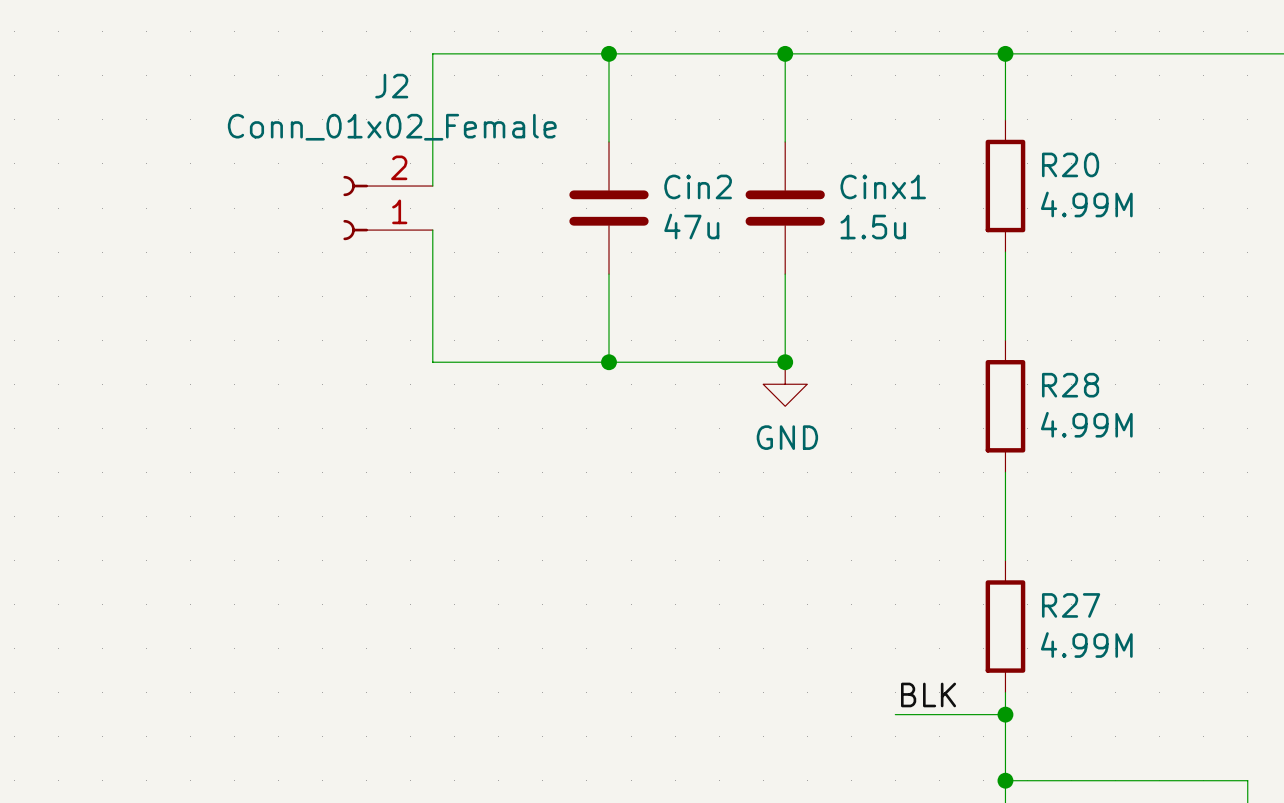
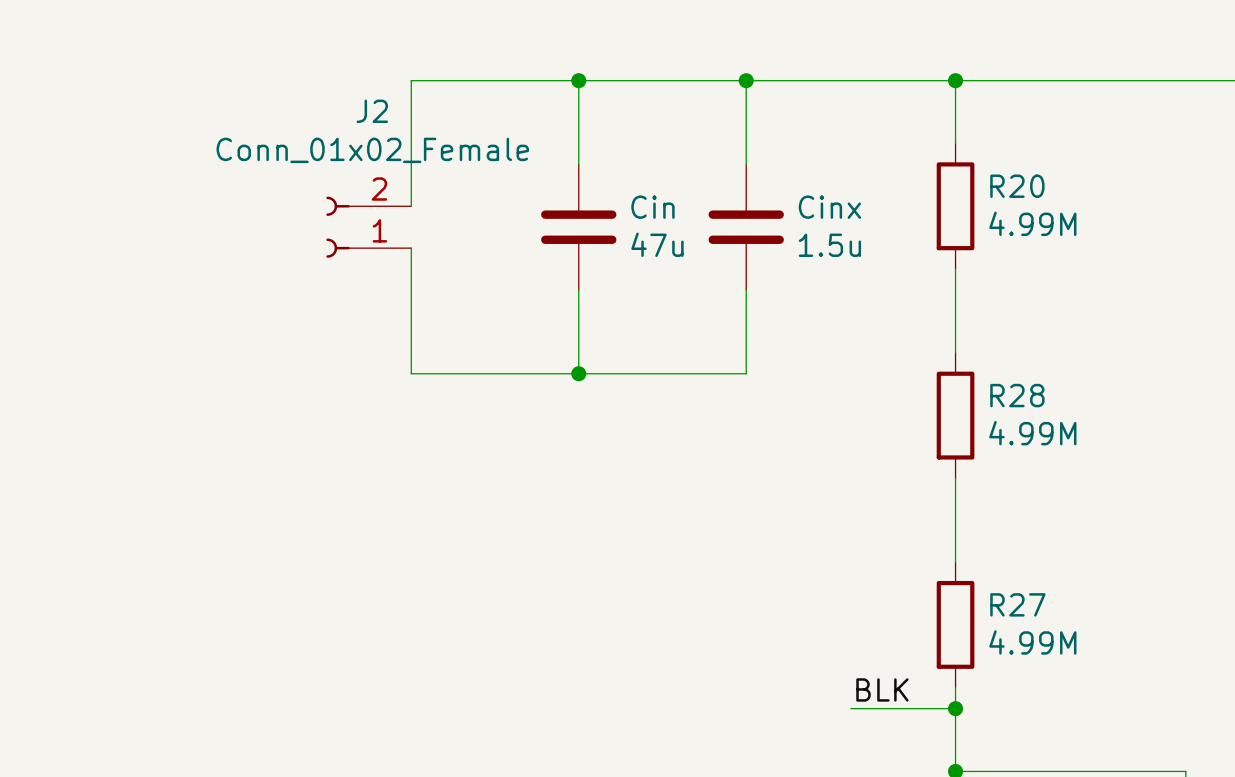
Cin2 name: Cin2 (698, 186) -> Cin (652, 207)
Cinx1 name: Cinx1 (883, 186) -> Cinx (829, 207)
junction: (785, 362) -> none
power symbol: GND (785, 384) -> none

